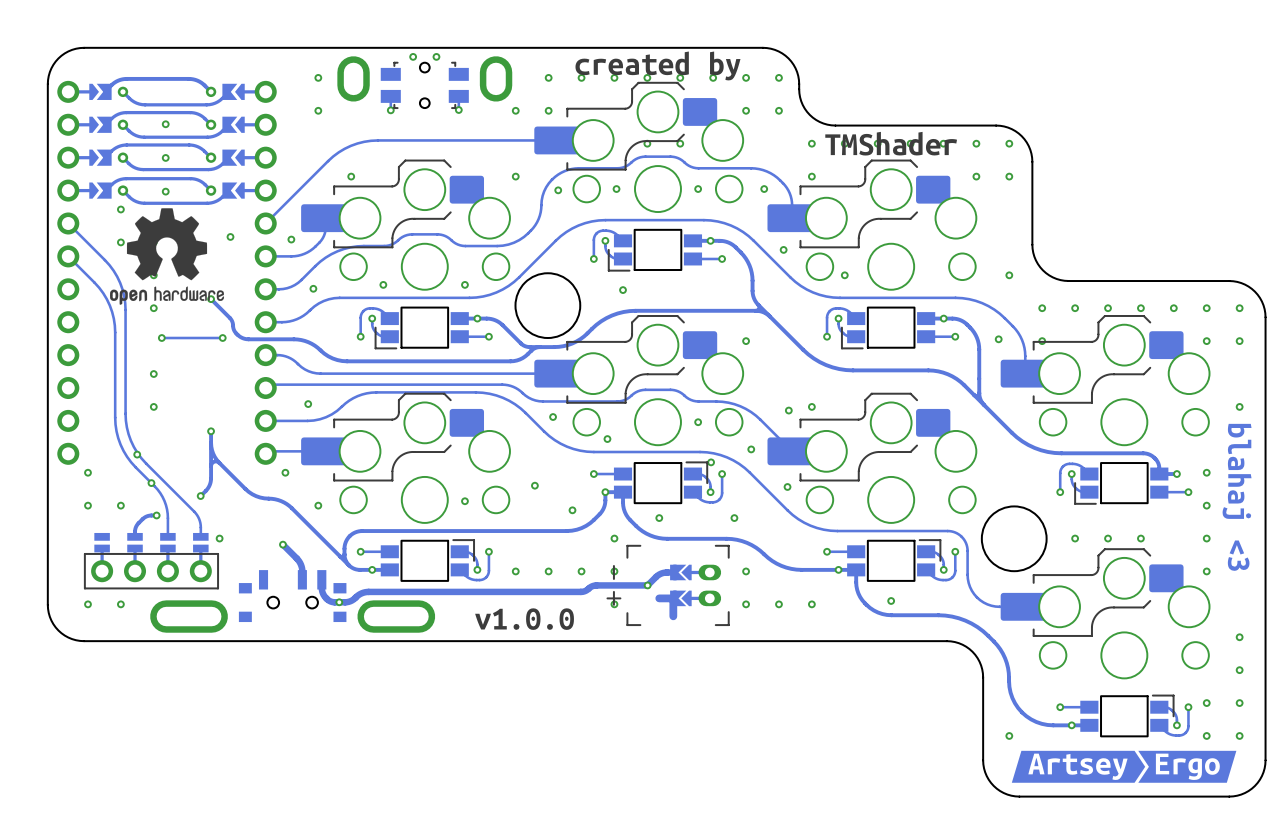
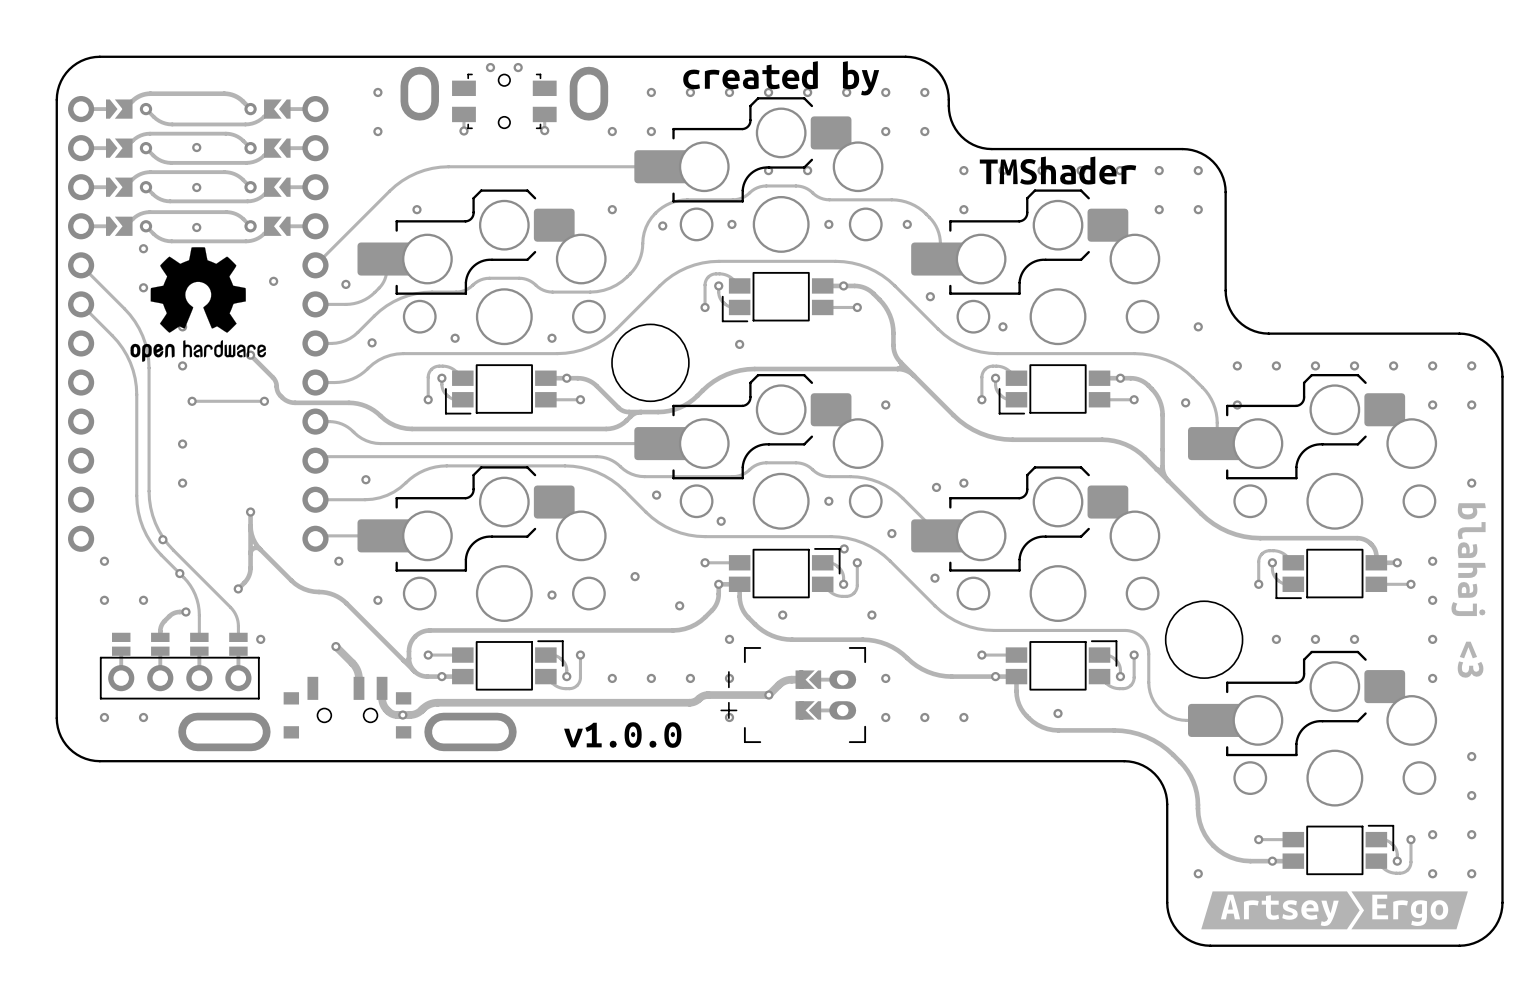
track: (659, 598) (673, 598) (673, 616) -> none

